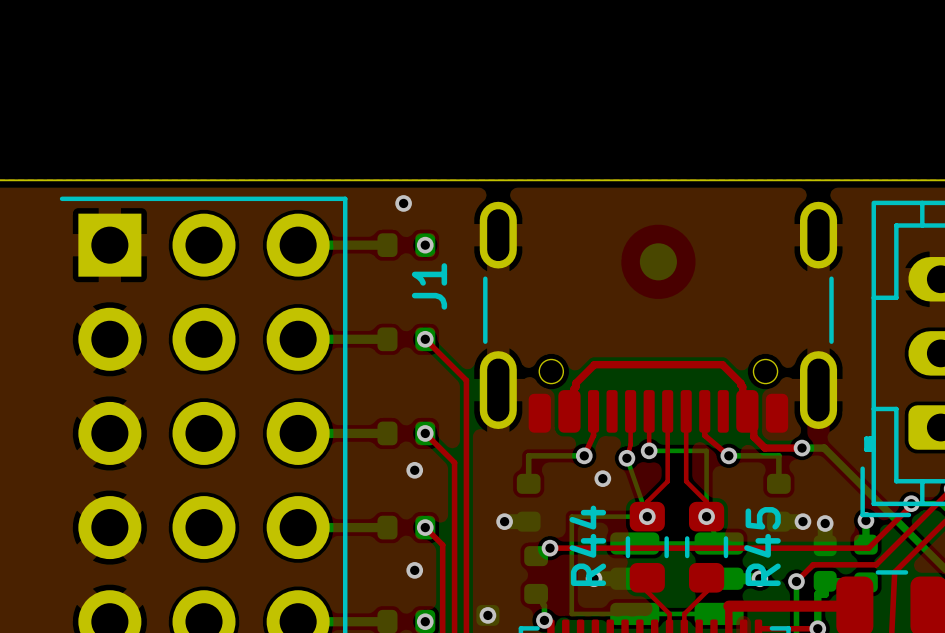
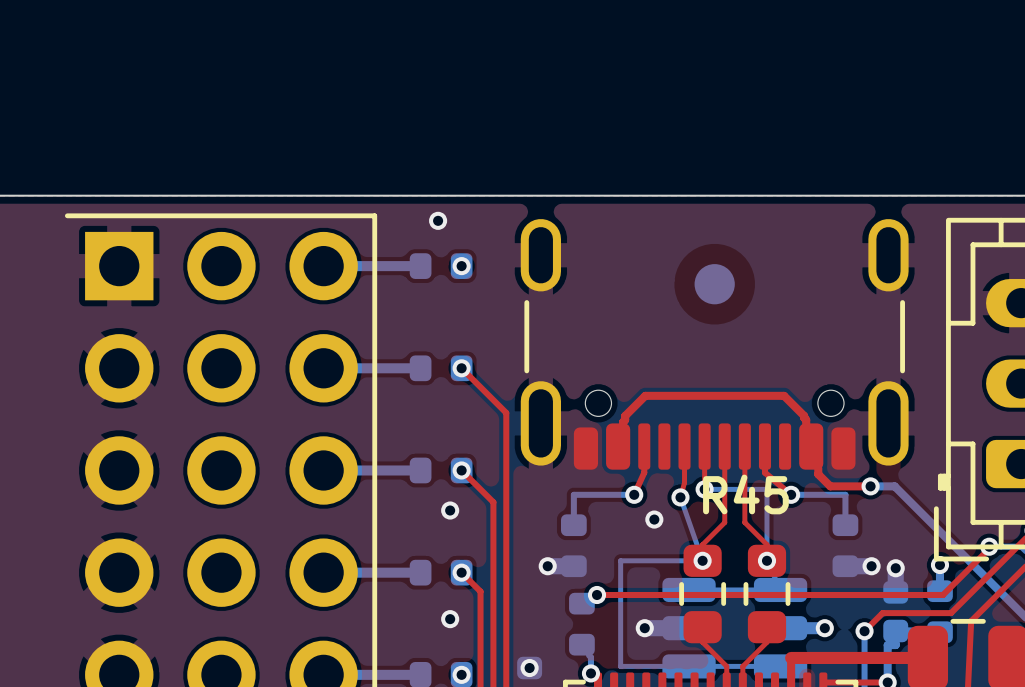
J1 name: J1 (429, 286) -> none
R44 name: R44 (587, 545) -> none
R45 name rotation: 0° (762, 546) -> 90° clockwise (745, 494)
R45 name position: R45 (762, 546) -> R45 (745, 494)

